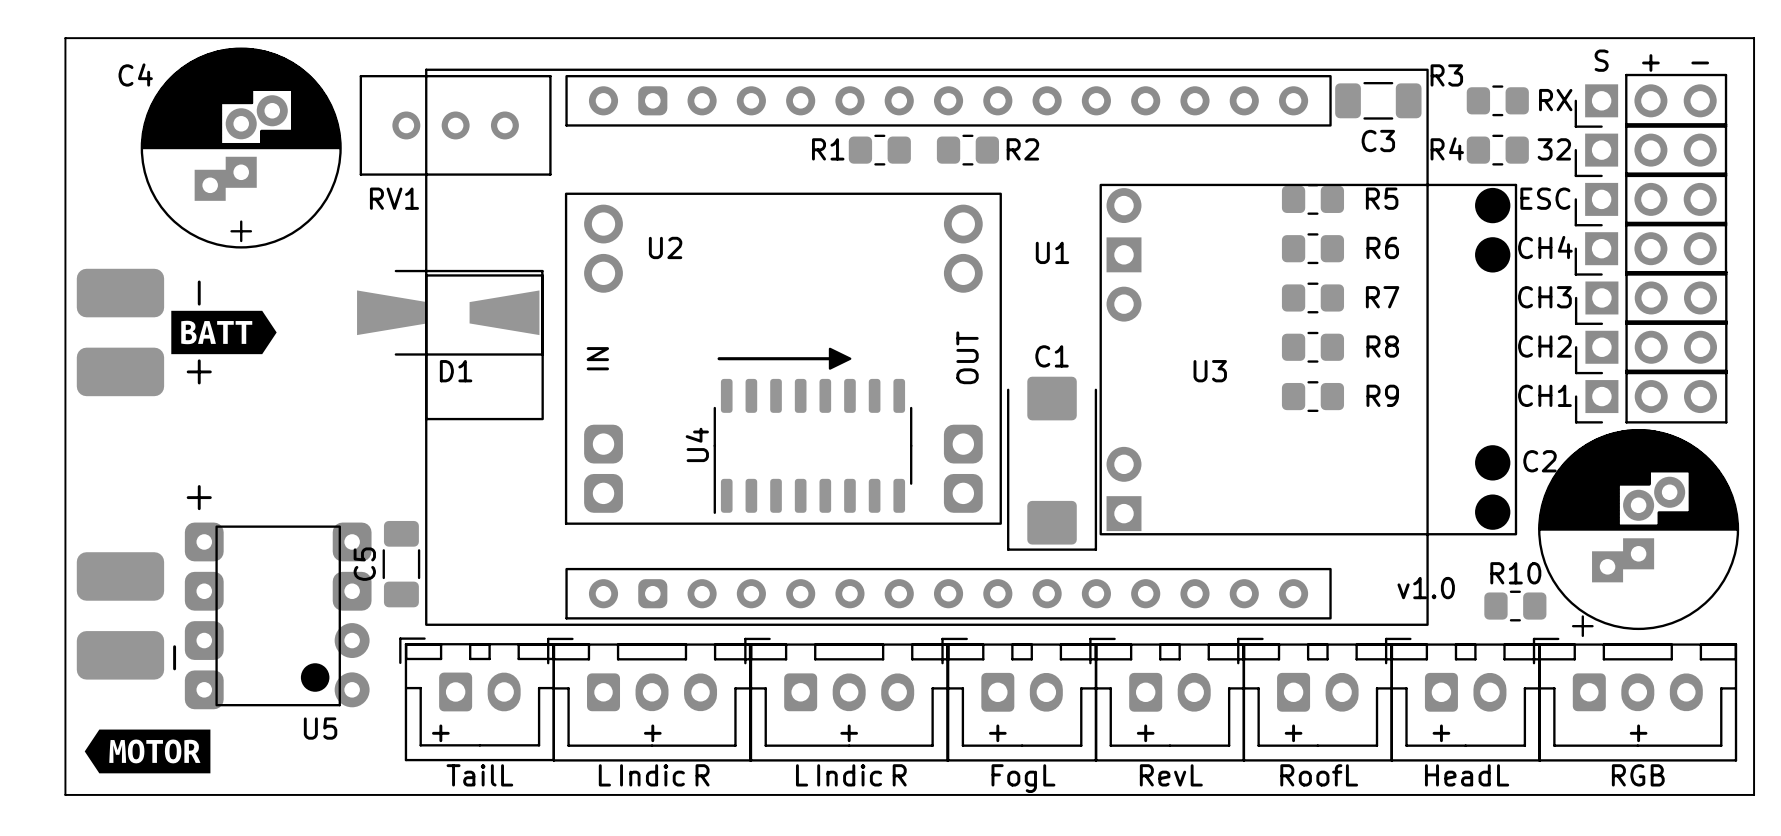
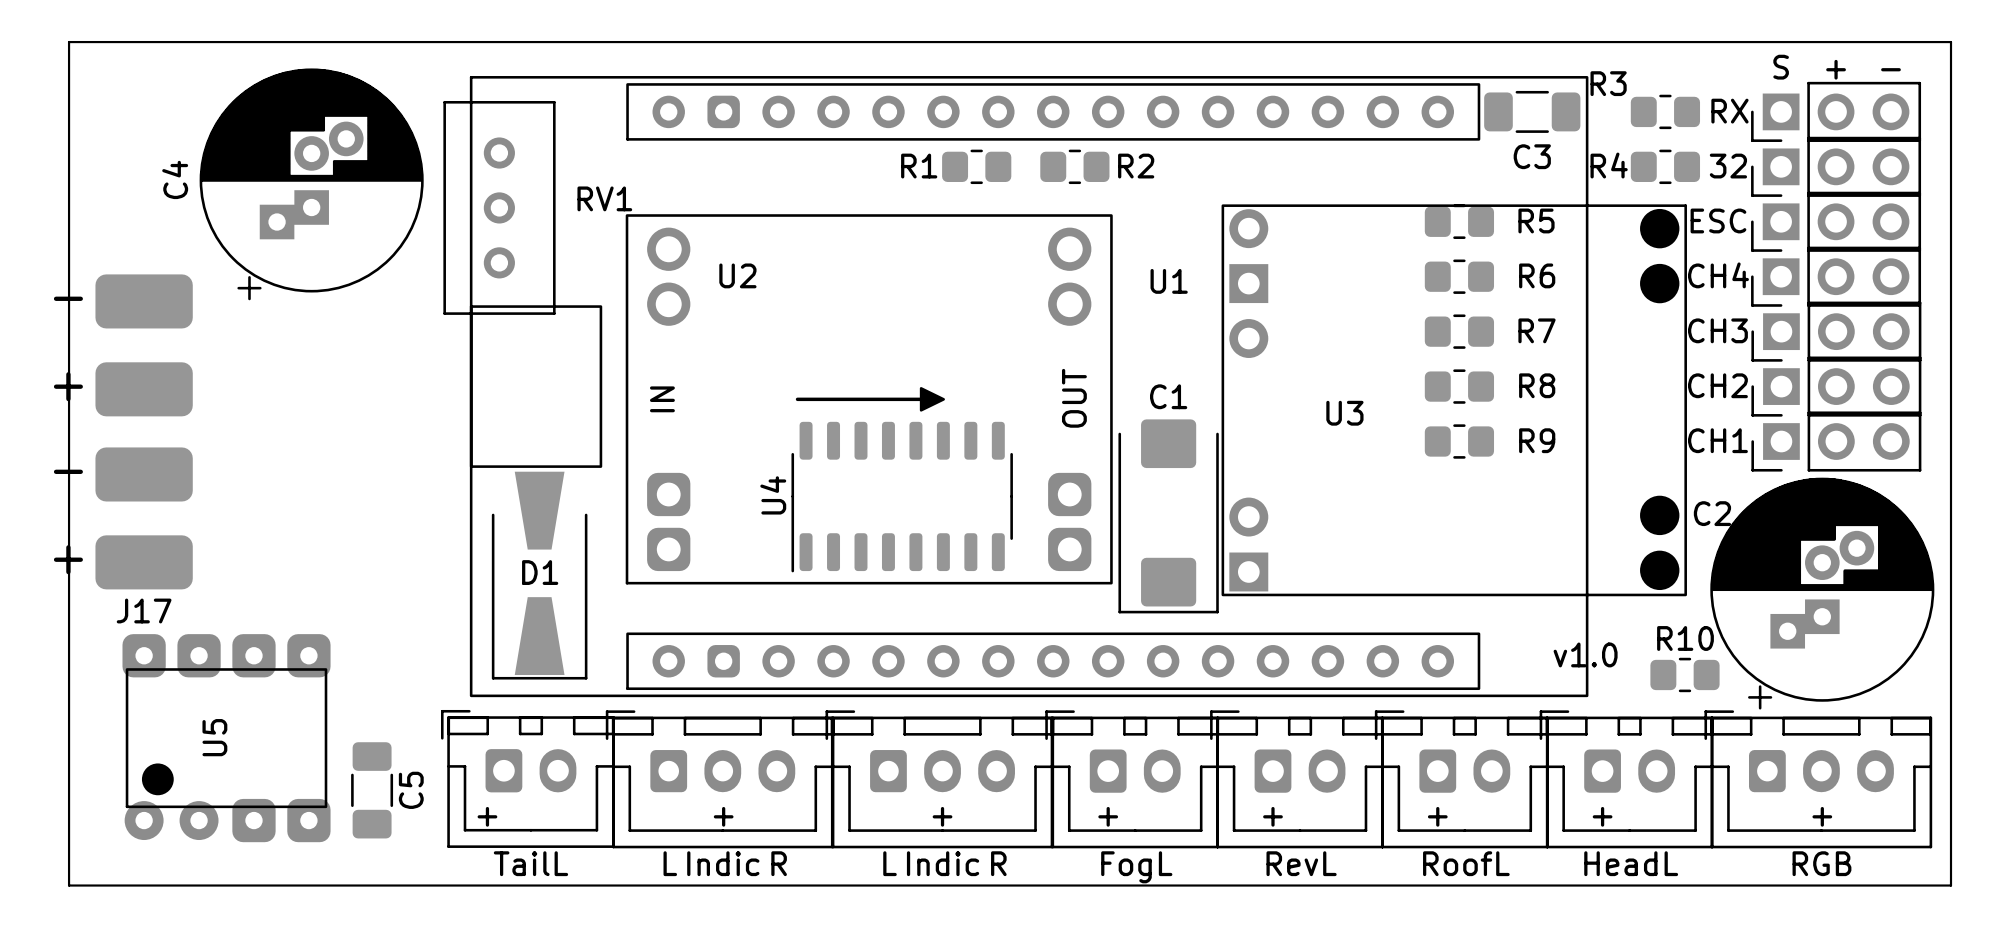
C4 footprint: [140, 47, 342, 249] -> [199, 68, 424, 301]
C4 name position: C4 (135, 74) -> C4 (175, 179)
RV1 rotation: 0° (455, 125) -> 90° clockwise (499, 207)
RV1 name position: RV1 (394, 198) -> RV1 (604, 198)
text: - (199, 293) -> none
part: none -> (144, 345)
drawing: [171, 310, 277, 355] -> none
D1 rotation: 0° (450, 312) -> 90° clockwise (539, 575)
D1 position: (450, 312) -> (539, 575)
part: (120, 332) -> none
text: + (199, 371) -> none
D1 name position: D1 (456, 371) -> D1 (540, 572)
J17: none -> (144, 518)
text: + (199, 497) -> none
C5 name position: C5 (364, 564) -> C5 (411, 790)
C5 position: (401, 564) -> (372, 790)
part: (120, 615) -> none
U5 rotation: 0° (278, 615) -> 90° clockwise (226, 738)
text: - (174, 657) -> none
U5 name position: U5 (320, 728) -> U5 (214, 737)
drawing: [84, 729, 211, 774] -> none

